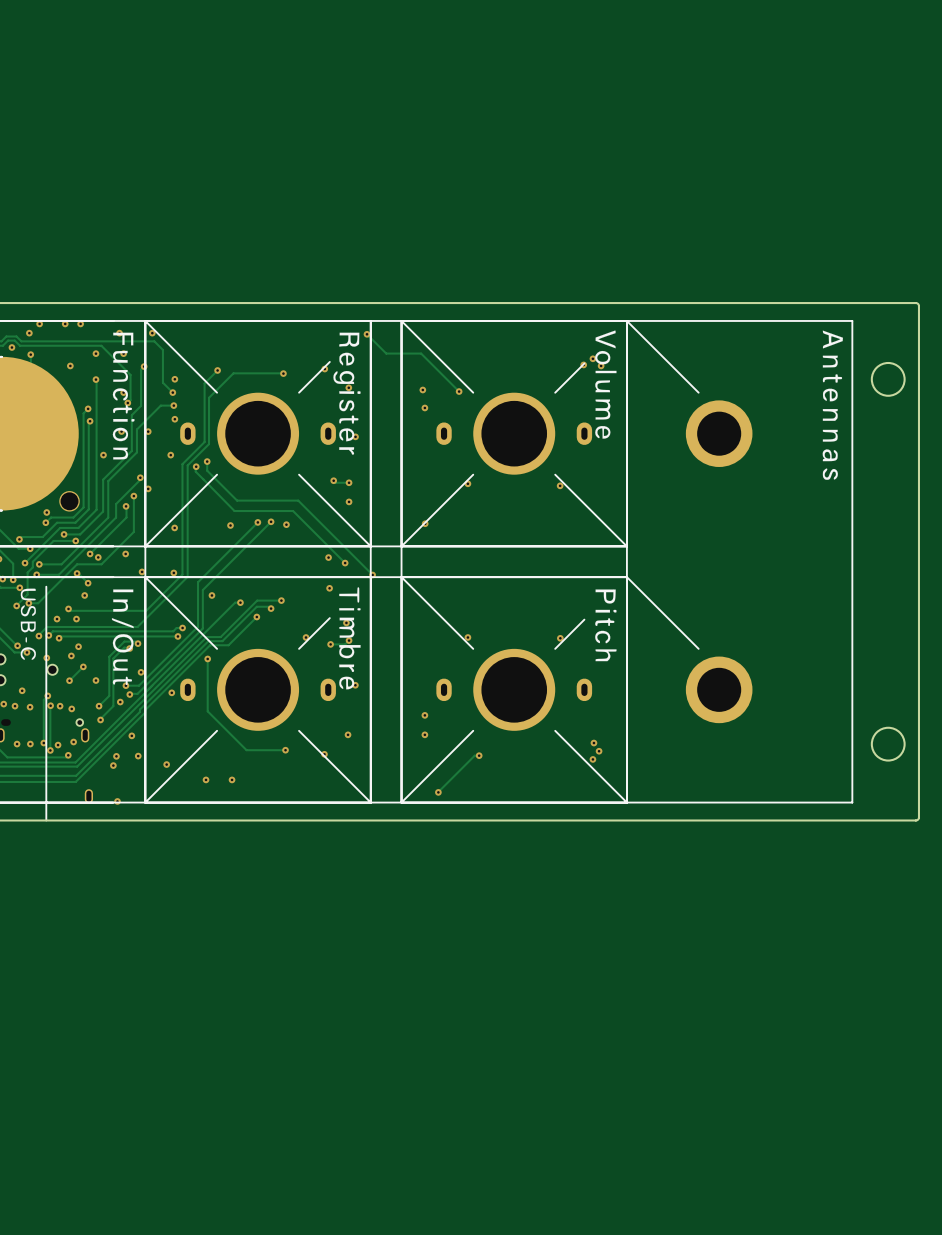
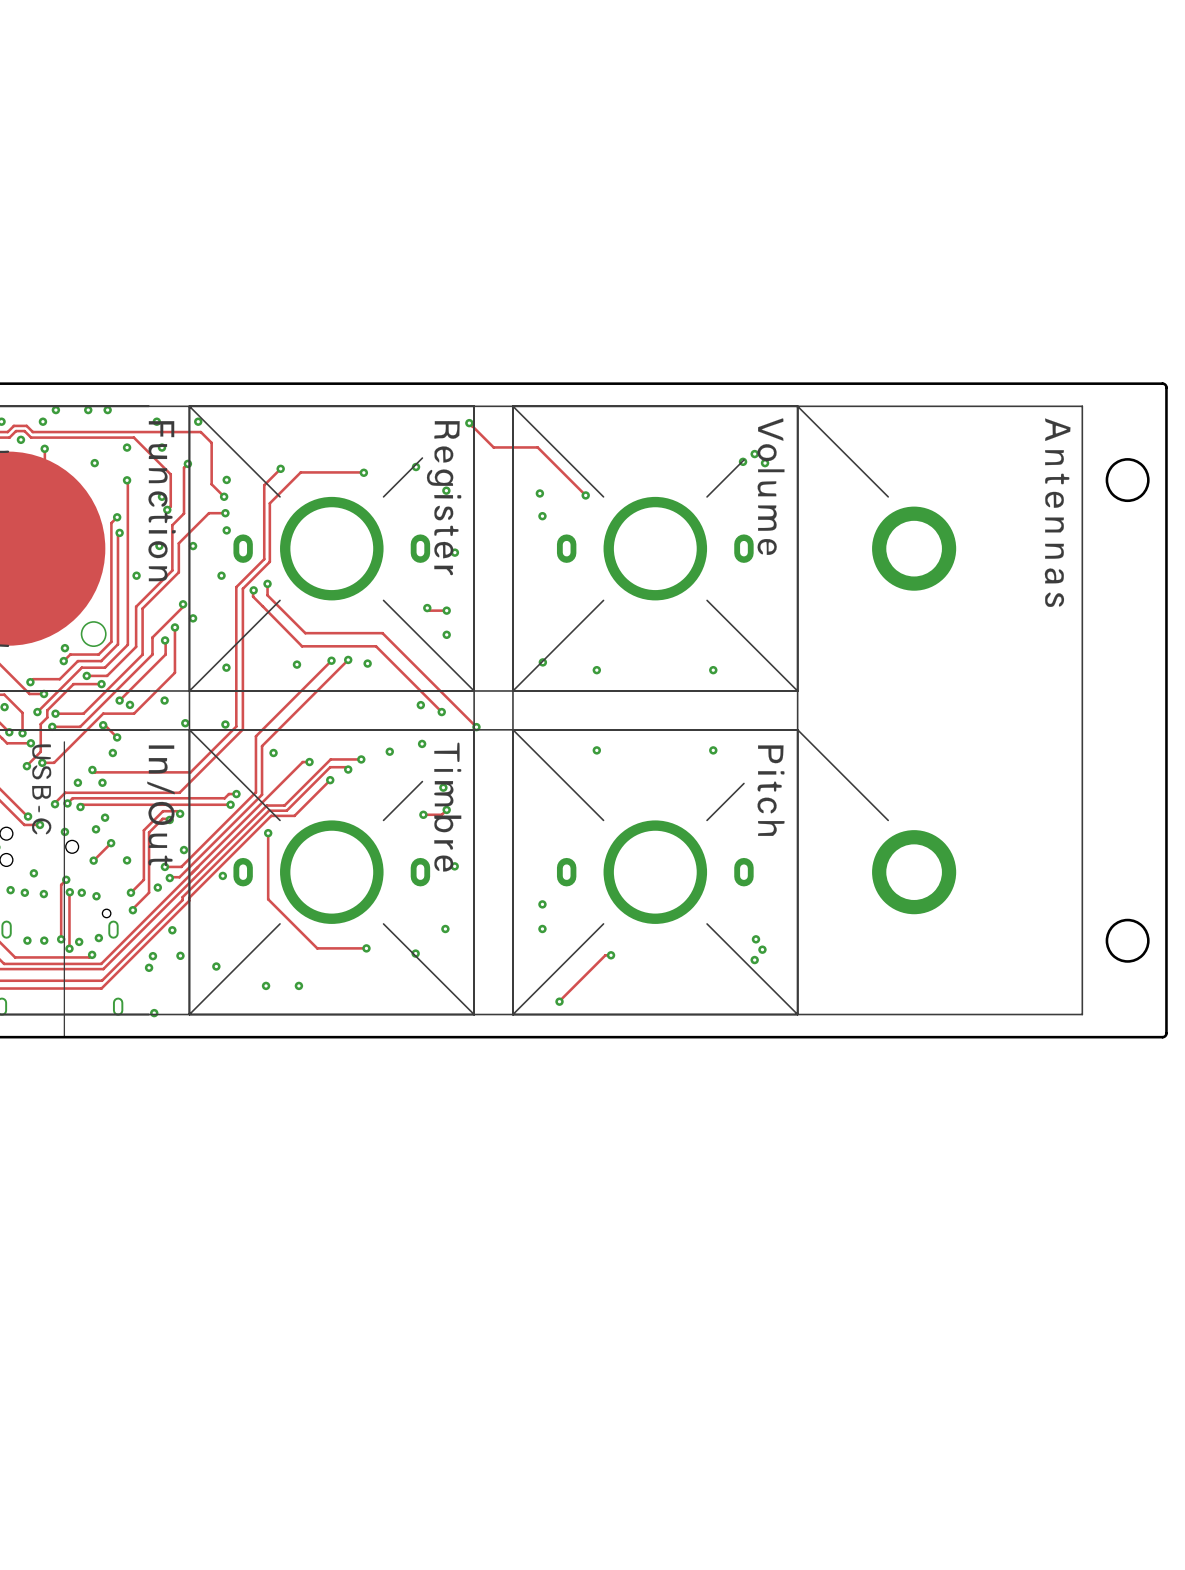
via position: (467, 483) -> (596, 670)
via position: (560, 485) -> (713, 670)
via position: (306, 637) -> (389, 751)
via position: (467, 637) -> (596, 750)
via position: (560, 638) -> (713, 750)

